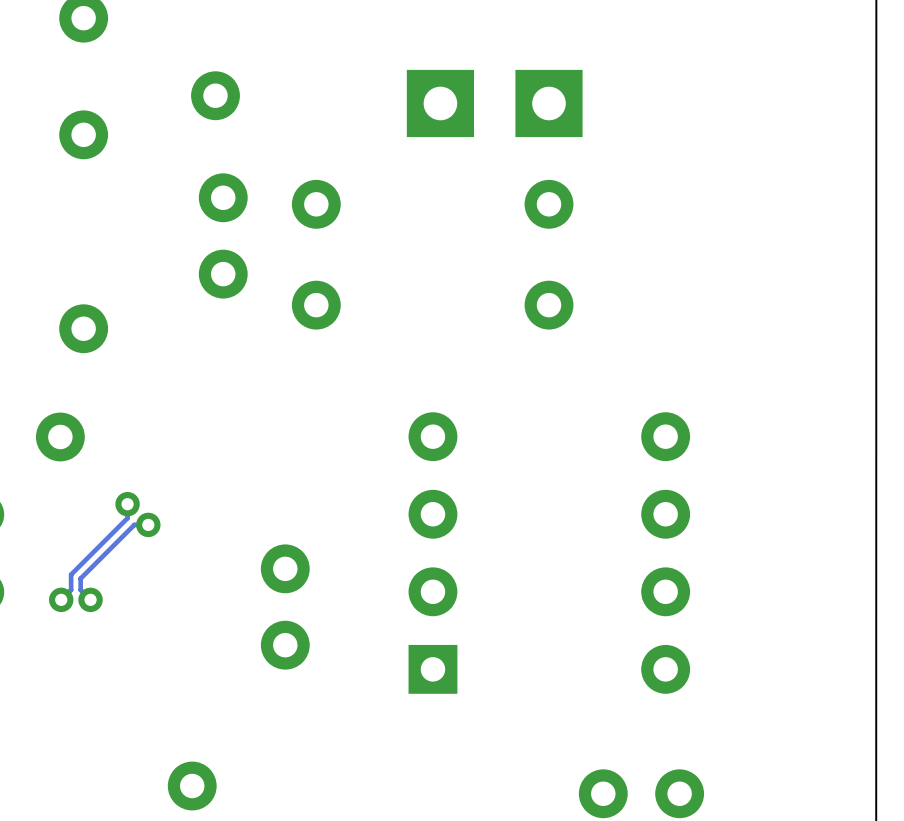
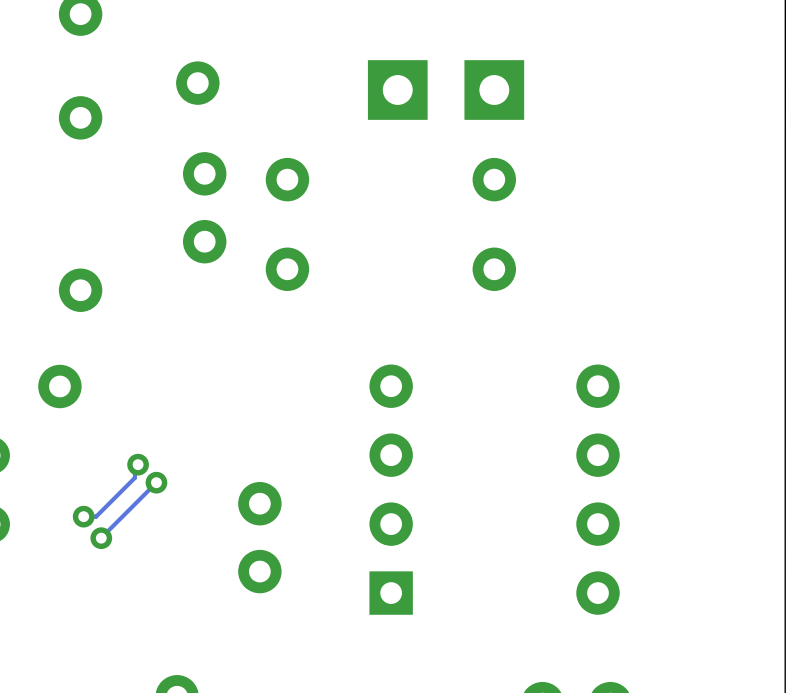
track: (127, 504) (127, 518) (71, 574) (71, 589) (61, 599) -> none
via: (127, 504) -> none
track: (148, 524) (134, 524) (80, 578) (80, 589) (90, 599) -> none
track: none -> (134, 465) (134, 477) (96, 516) (83, 516)
track: none -> (156, 482) (101, 537)
via: none -> (156, 482)
via: none -> (83, 516)
via: (61, 599) -> none
via: (90, 599) -> none
via: none -> (101, 538)

